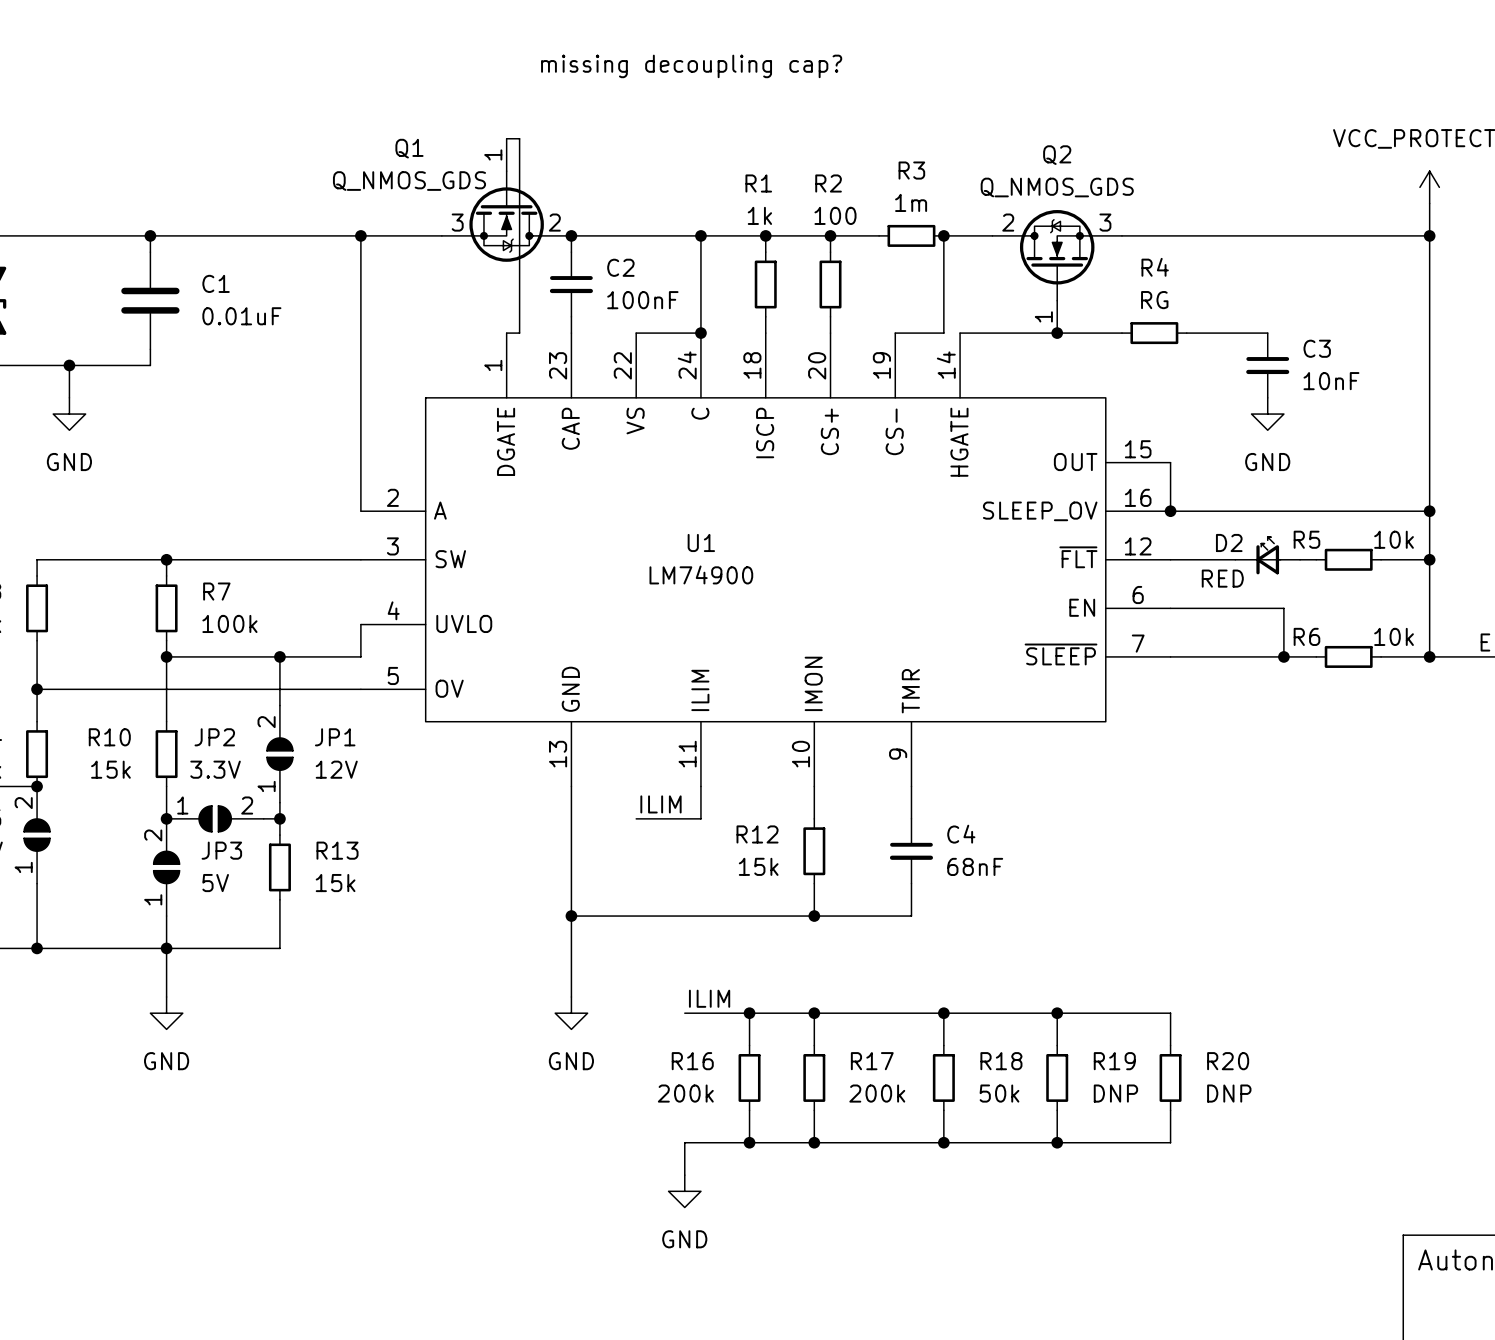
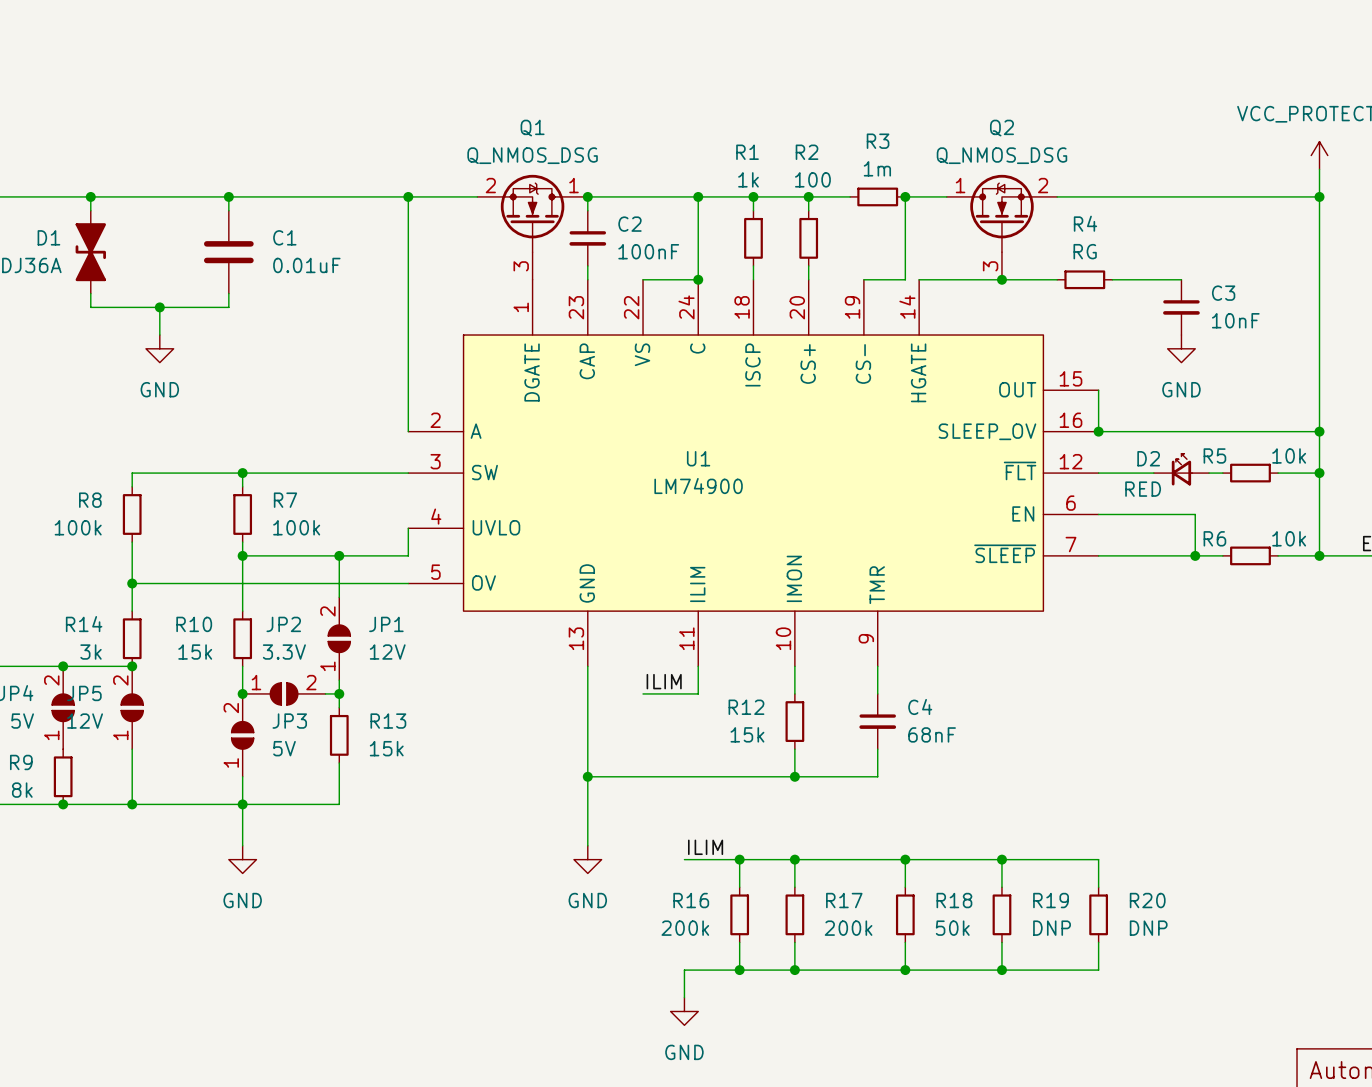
text: missing decoupling cap? (691, 66) -> none
Q1 symbol: [441, 138, 572, 262] -> [477, 174, 588, 280]
wire: (506, 138) (519, 138) (519, 333) (506, 333) -> none
Q1 name position: Q1 (409, 148) -> Q1 (532, 128)
Q1 value: Q_NMOS_GDS (409, 181) -> Q_NMOS_DSG (532, 155)
Q2 value: Q_NMOS_GDS (1057, 187) -> Q_NMOS_DSG (1001, 155)
Q2 pin number: 2 (1008, 222) -> 1 (960, 185)
Q2 pin number: 3 (1105, 222) -> 2 (1043, 185)
Q2 pin number: 1 (1043, 316) -> 3 (990, 266)

